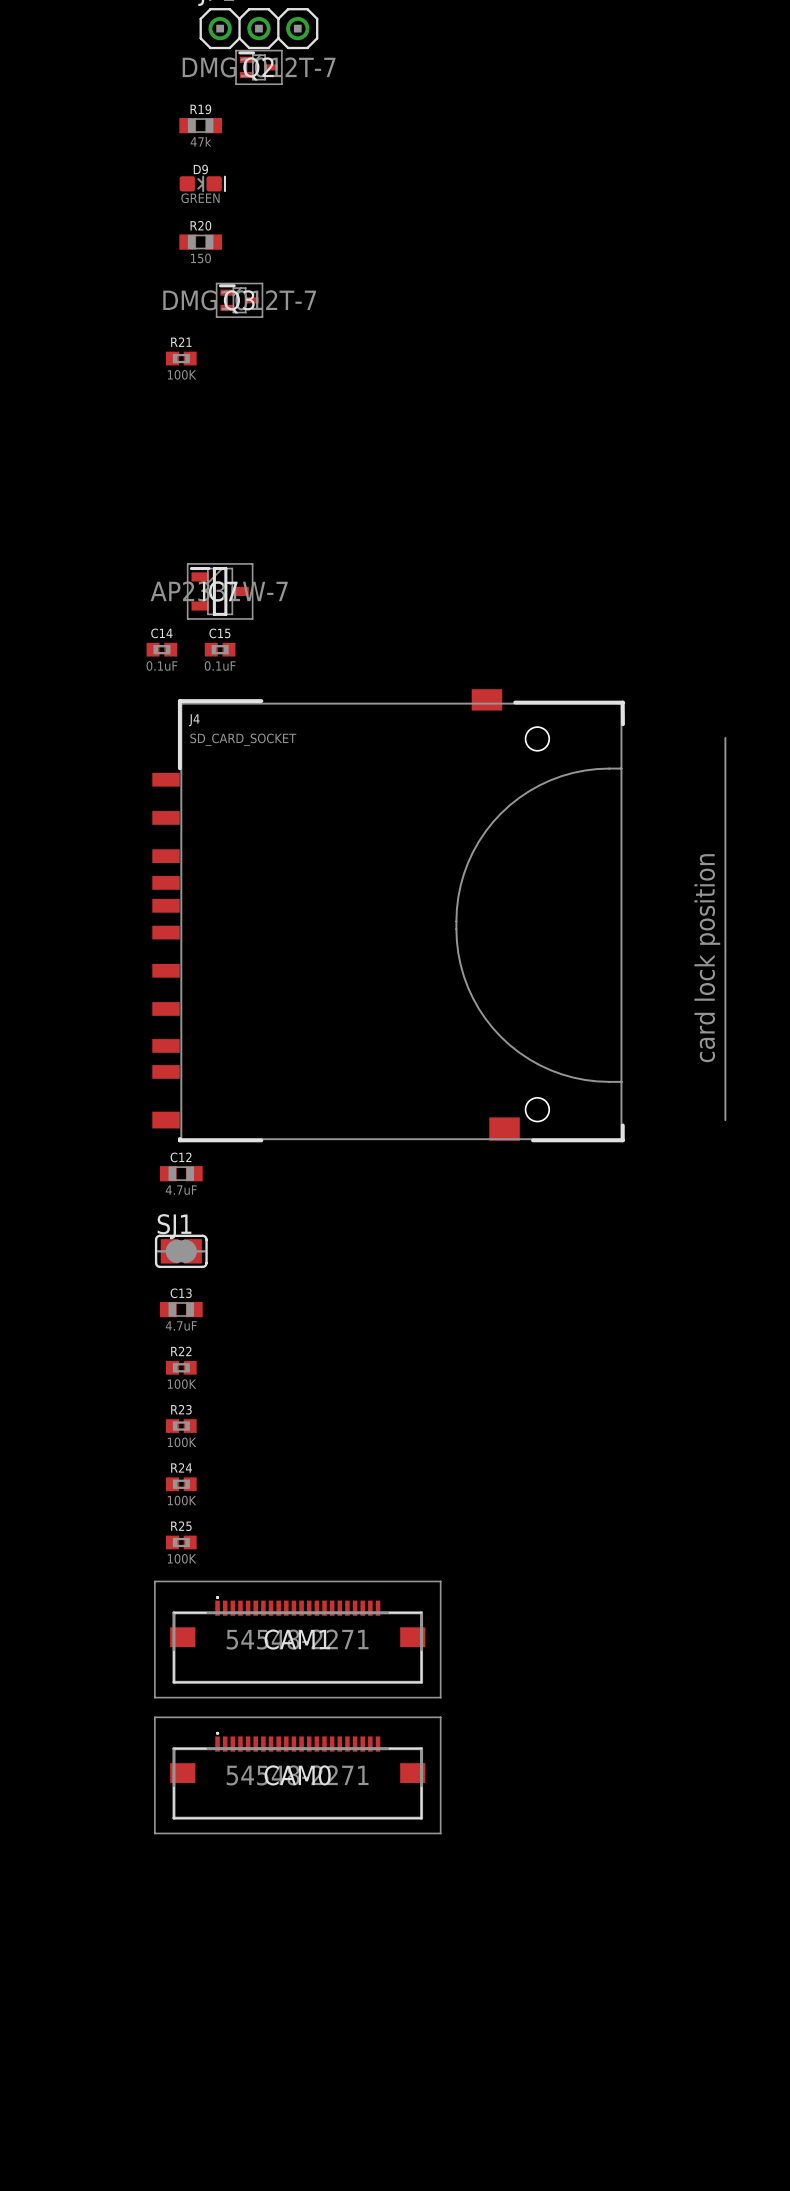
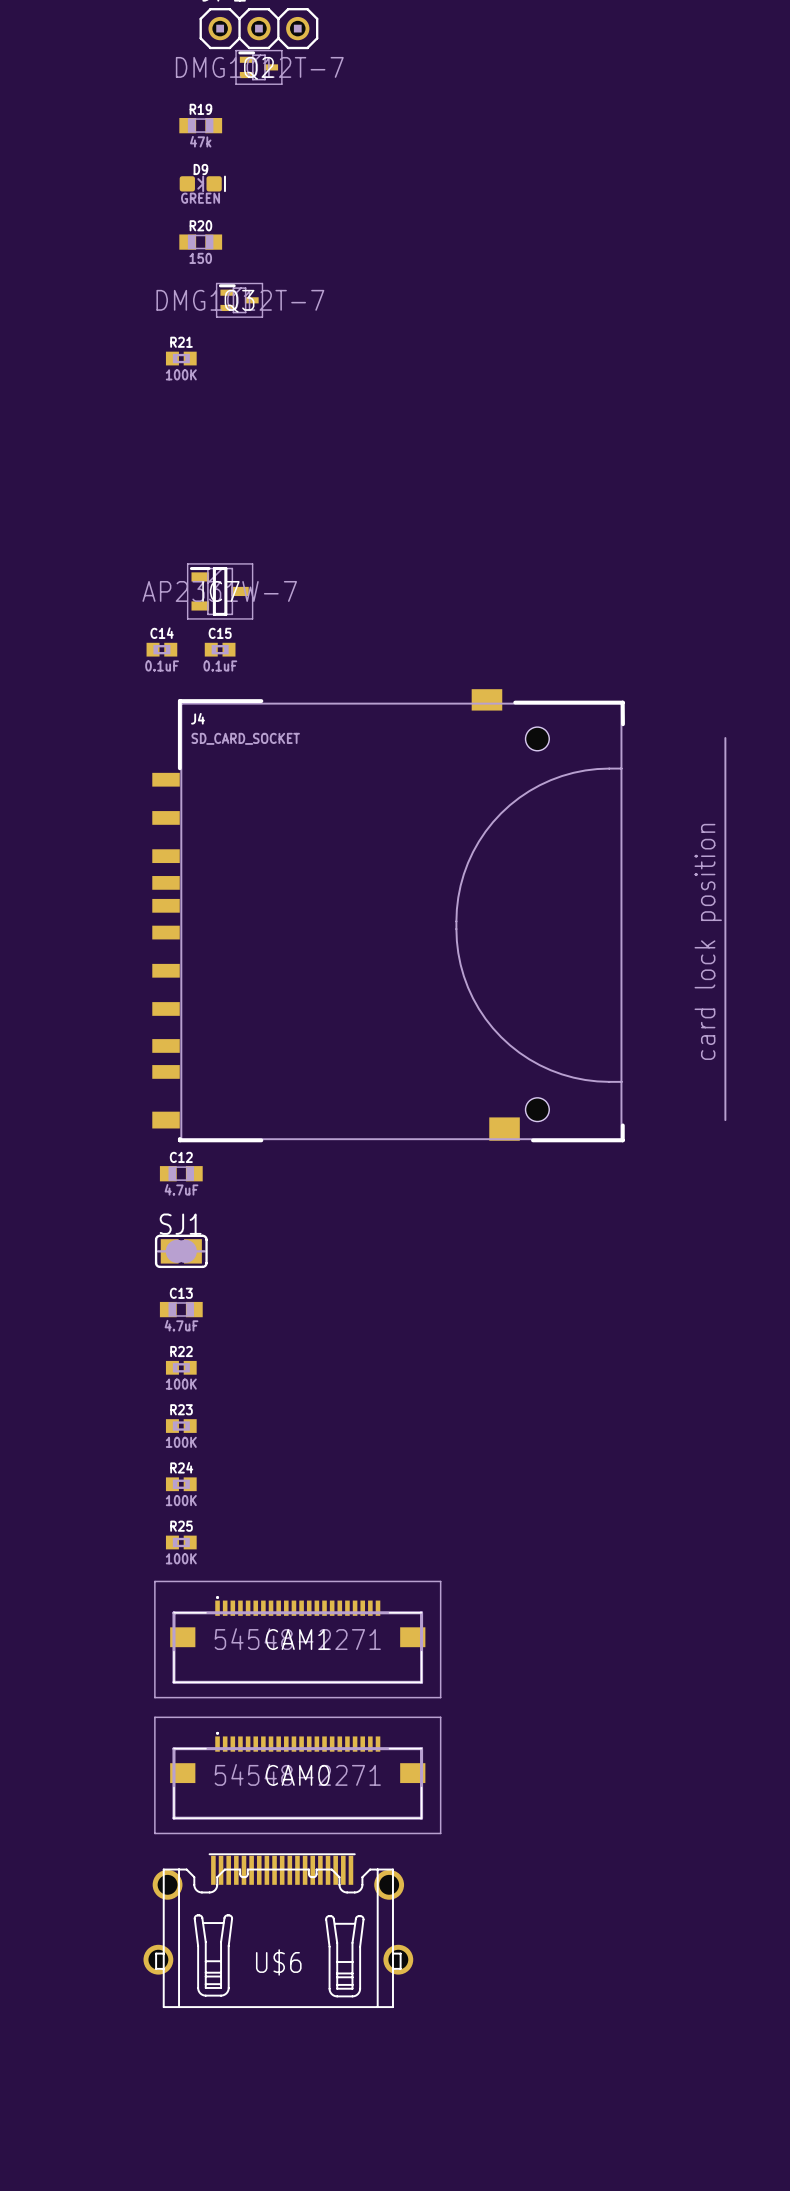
U$6: none -> (278, 1930)

